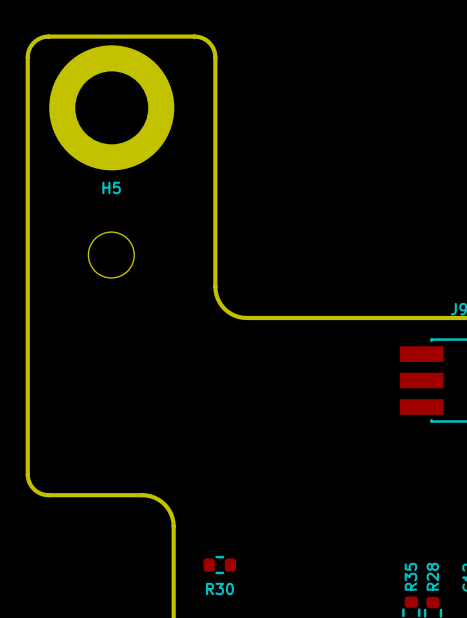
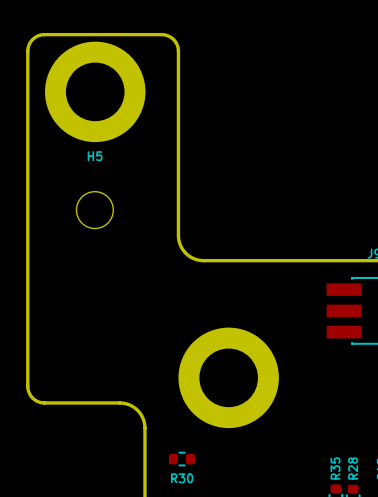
part: none -> (228, 377)

